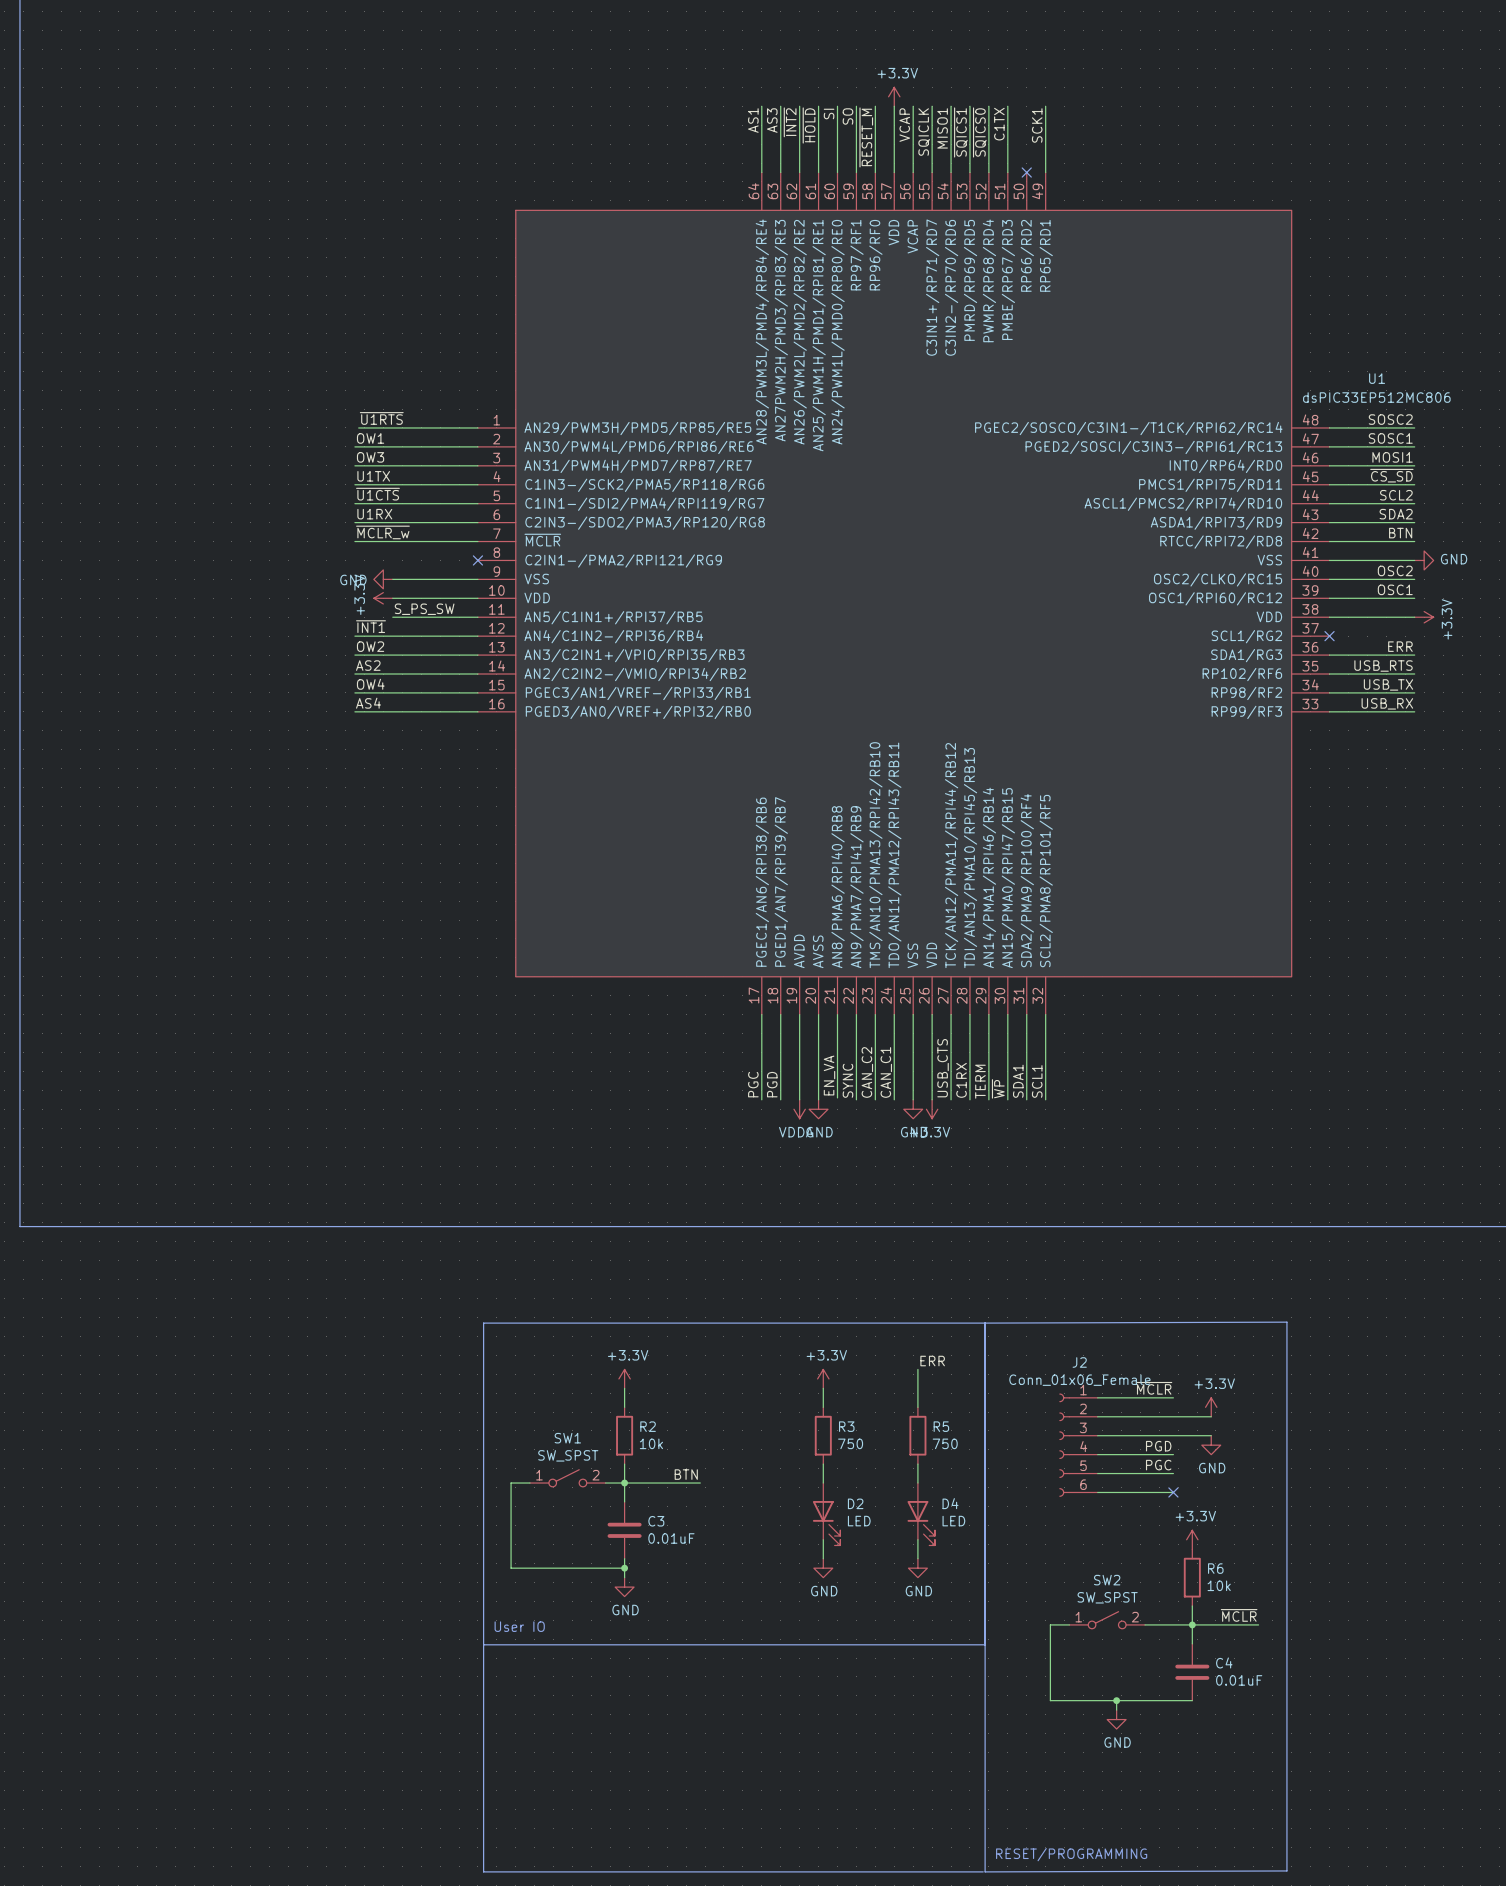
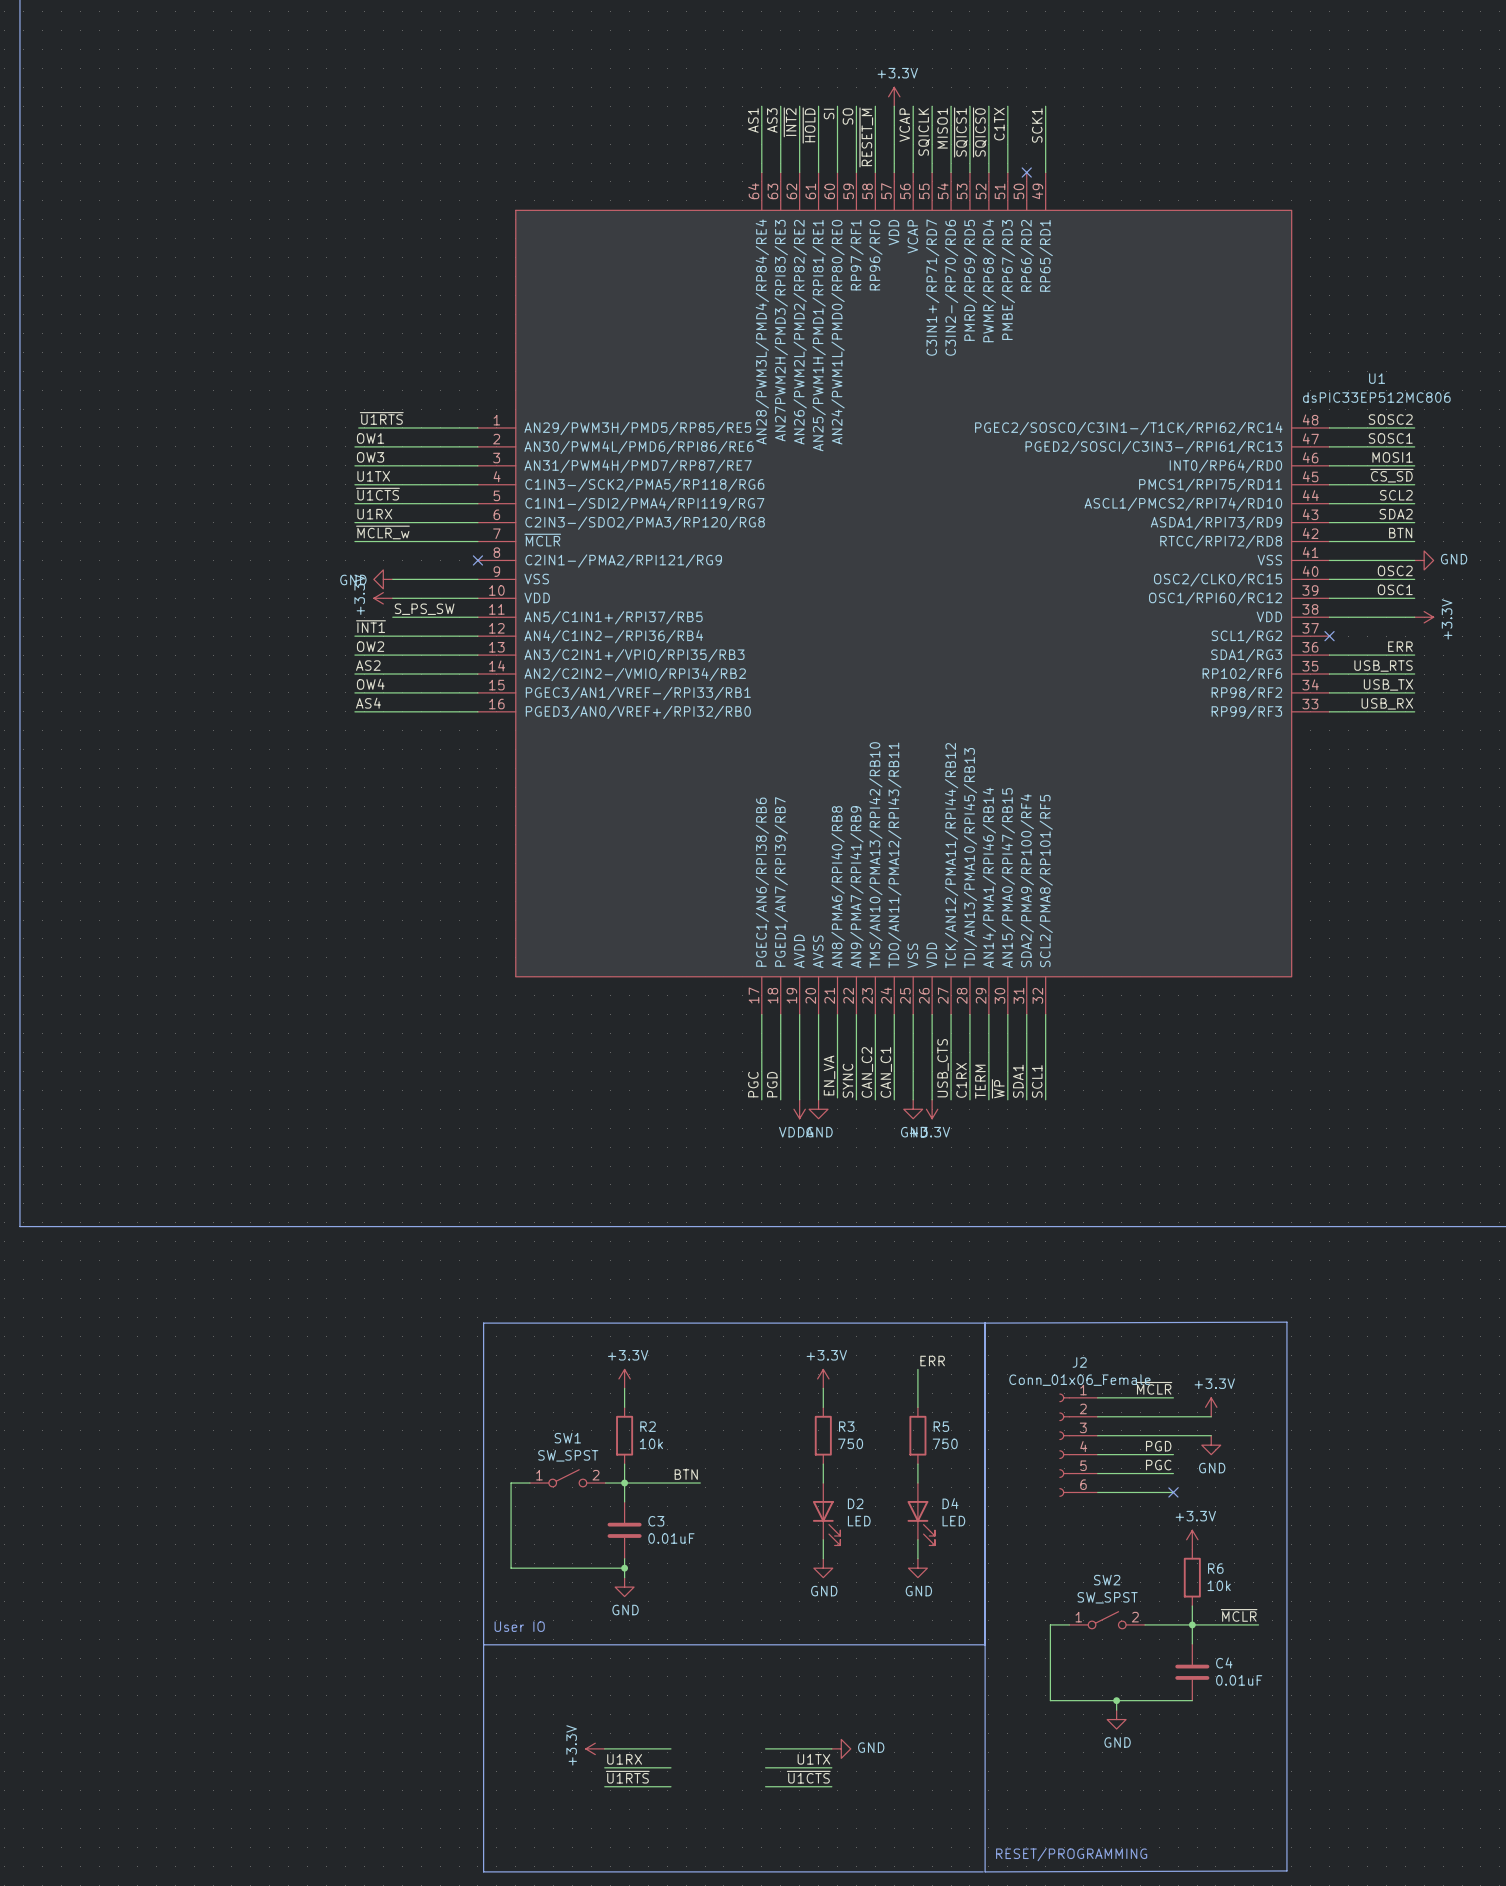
power symbol: none -> +3.3V (595, 1748)
wire: none -> (604, 1748) (670, 1748)
wire: none -> (765, 1748) (831, 1748)
power symbol: none -> GND (841, 1748)
label: none -> U1RX (624, 1759)
label: none -> U1TX (813, 1759)
wire: none -> (604, 1767) (670, 1767)
wire: none -> (765, 1767) (831, 1767)
label: none -> ~{U1RTS} (627, 1777)
label: none -> ~{U1CTS} (808, 1777)
wire: none -> (604, 1786) (670, 1786)
wire: none -> (765, 1786) (831, 1786)

